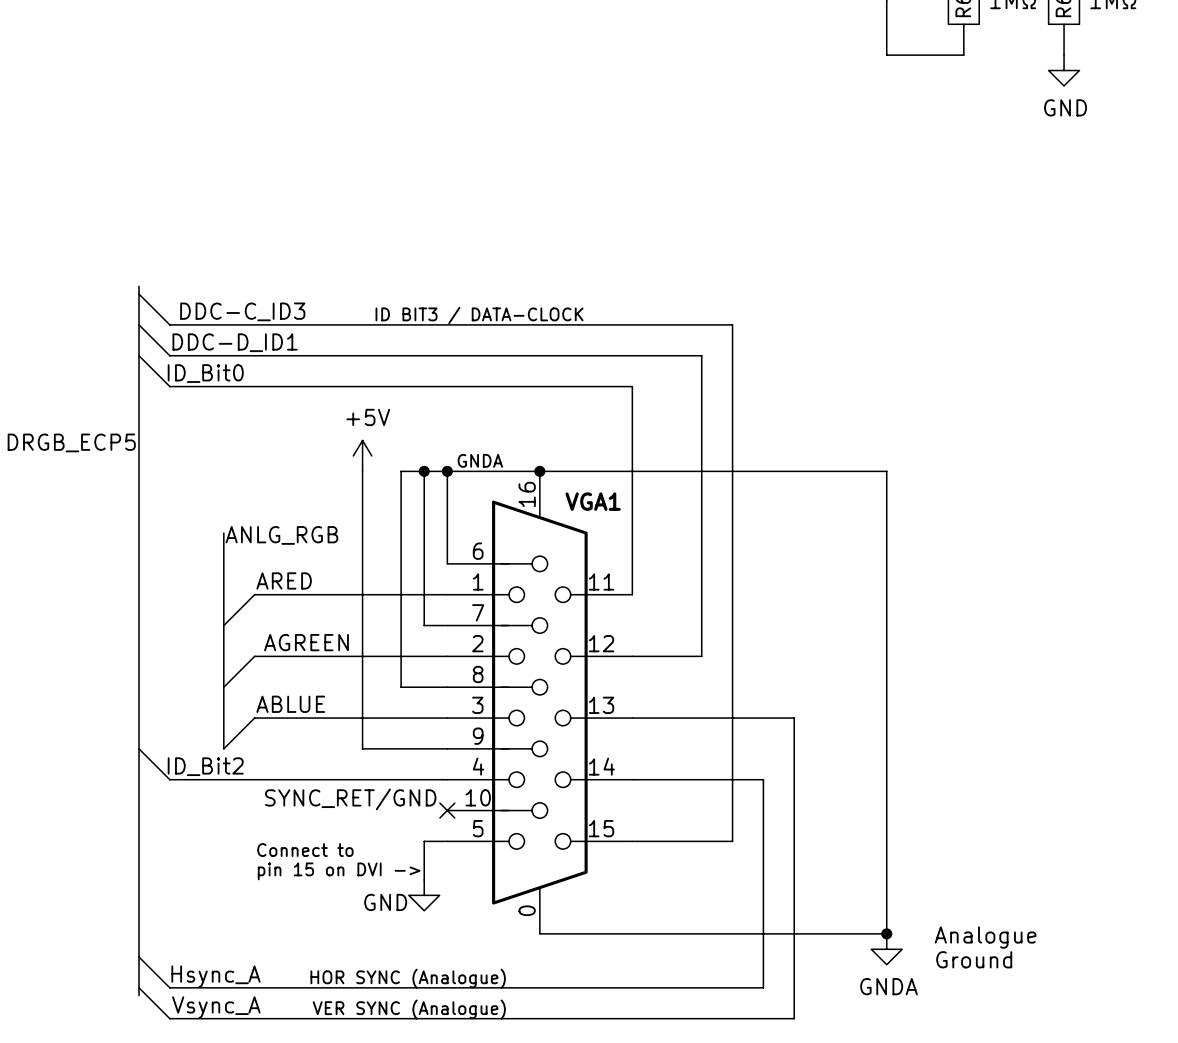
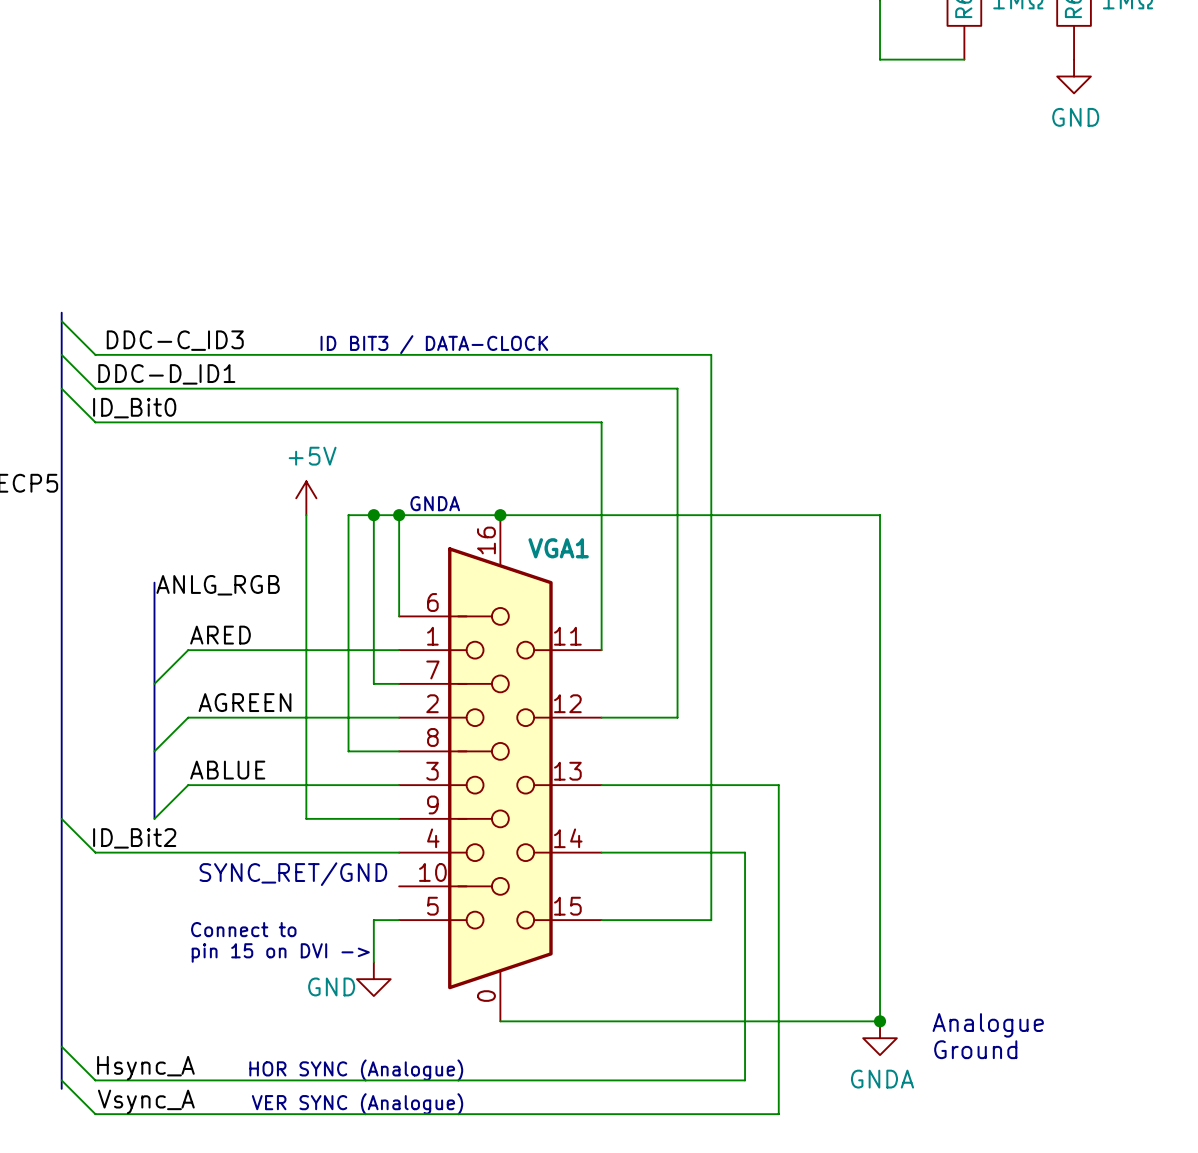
no-connect mark: (447, 810) -> none

